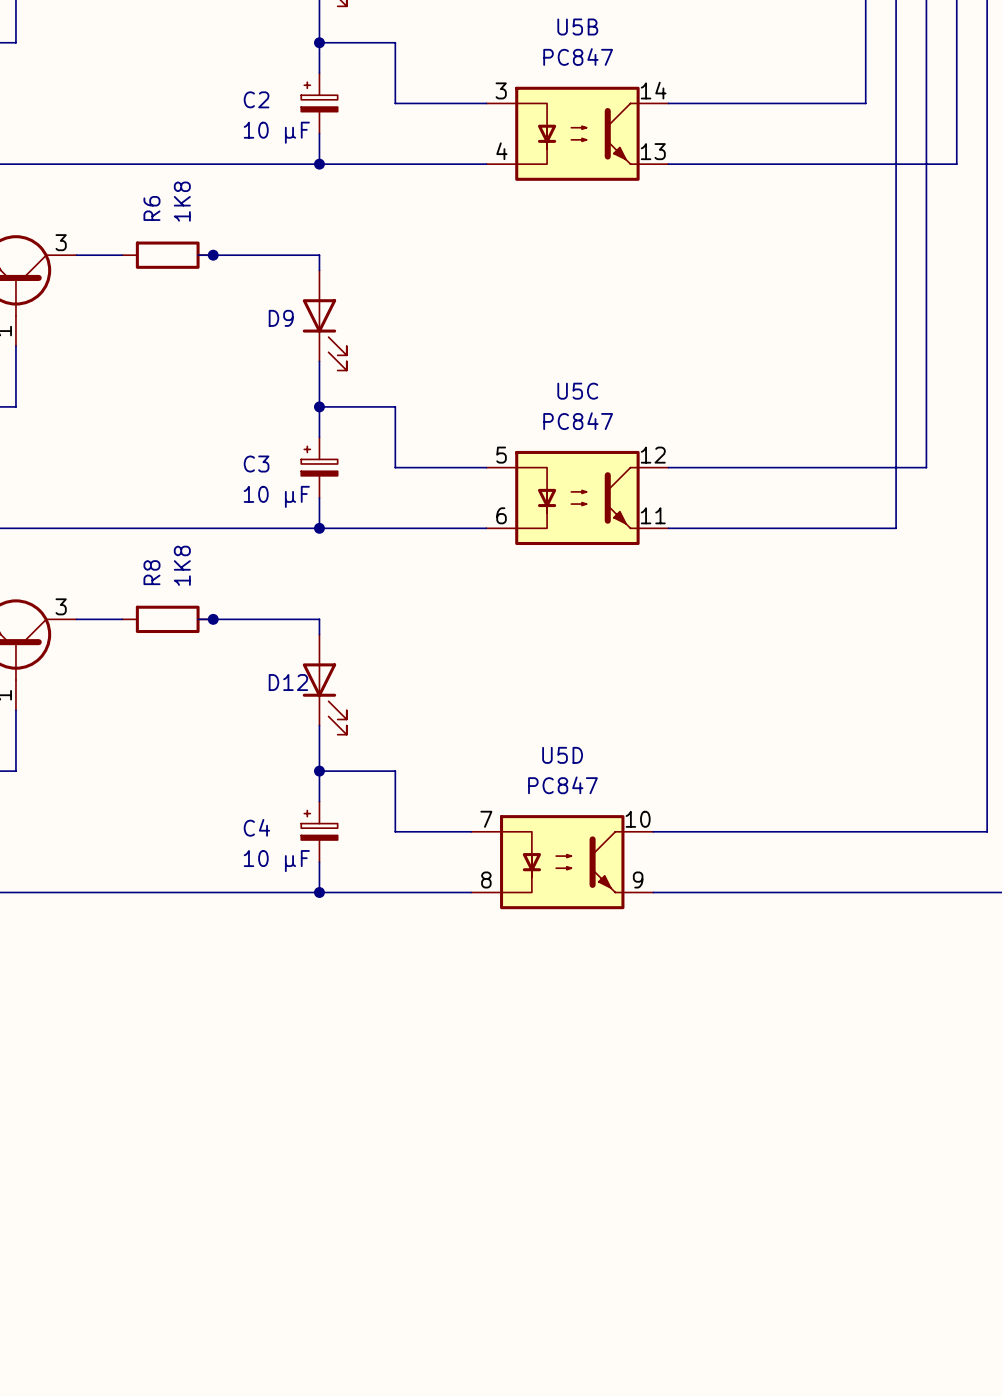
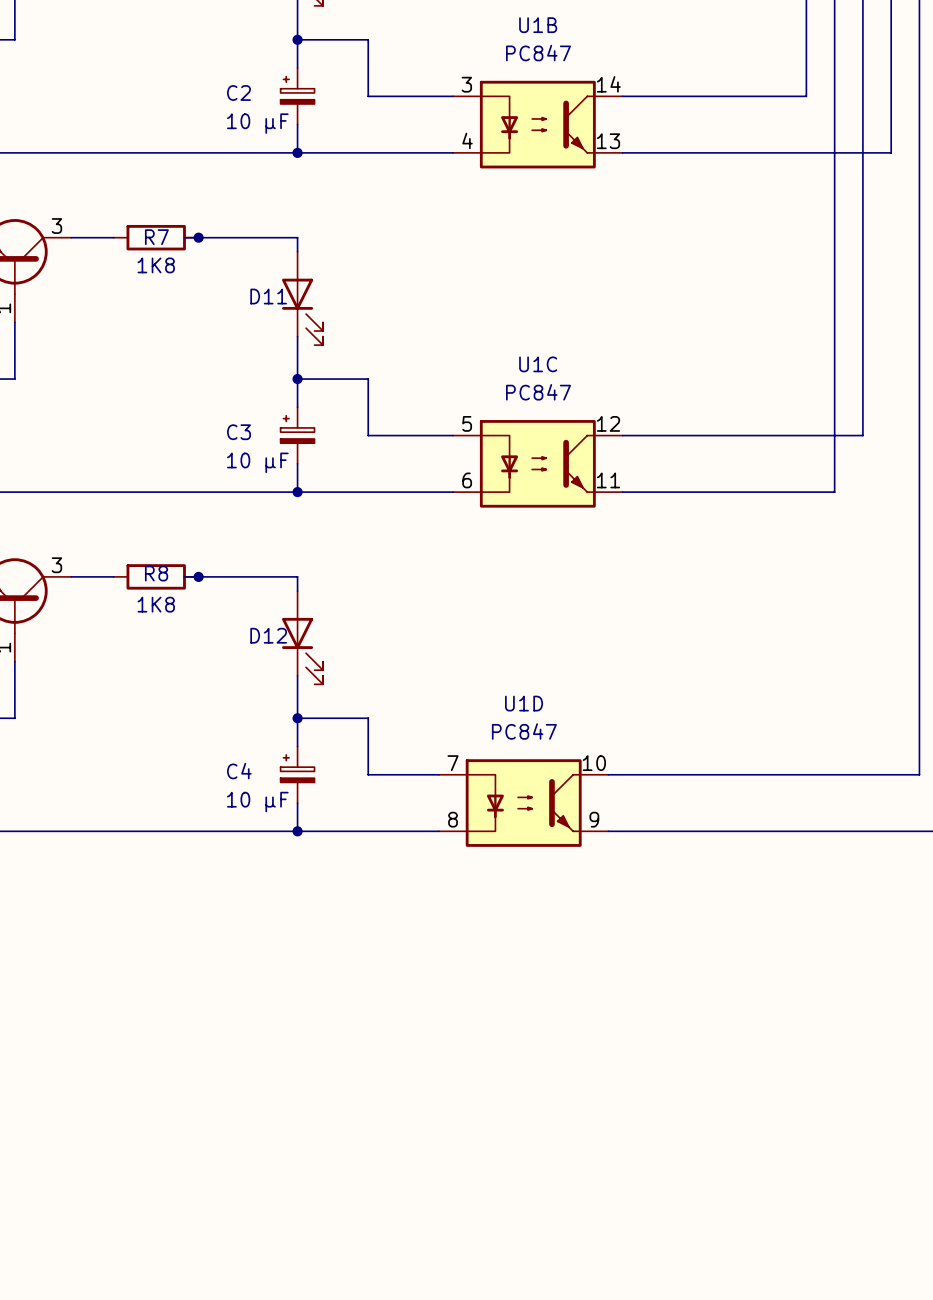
U5B name: U5B (577, 27) -> U1B (538, 25)
R6 value rotation: 0° (182, 201) -> 90° clockwise (156, 265)
R6 value position: 1K8 (182, 201) -> 1K8 (156, 265)
R6 name: R6 (151, 208) -> R7 (156, 237)
D9 name: D9 (281, 318) -> D11 (268, 296)
U5C name: U5C (577, 391) -> U1C (538, 364)
R8 value rotation: 0° (182, 565) -> 90° clockwise (156, 604)
R8 value position: 1K8 (182, 565) -> 1K8 (156, 604)
R8 name rotation: 0° (151, 572) -> 90° clockwise (156, 573)
R8 name position: R8 (151, 572) -> R8 (156, 573)
U5D name: U5D (562, 755) -> U1D (524, 703)

